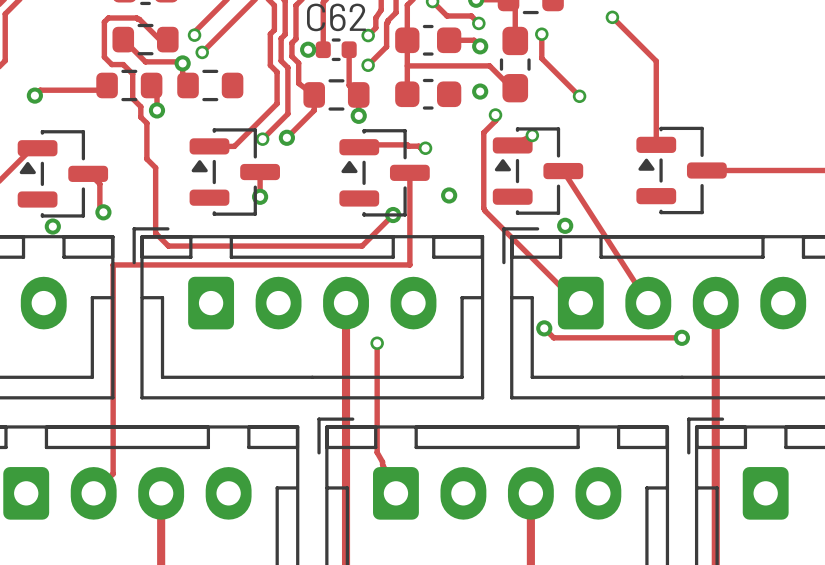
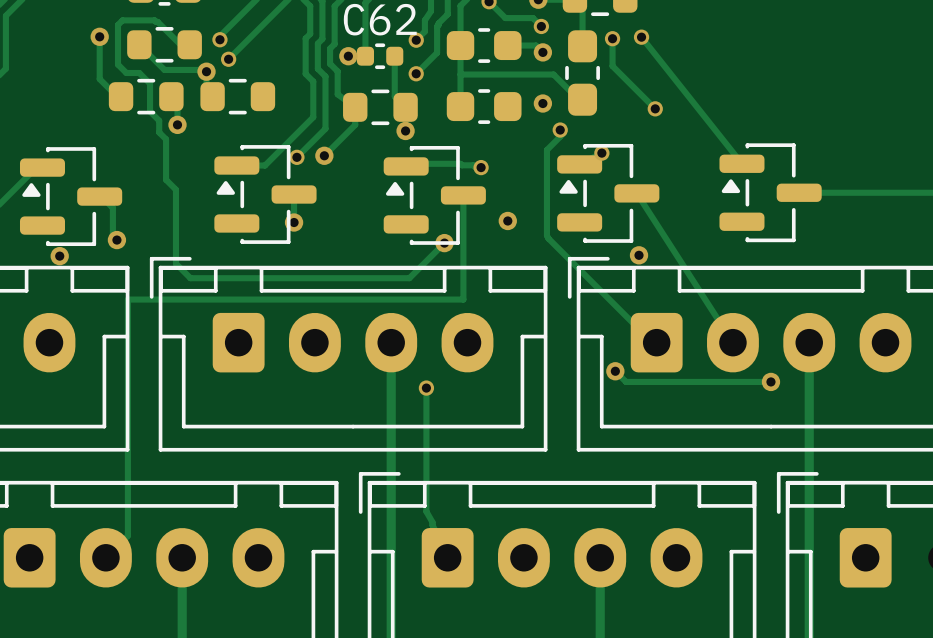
track: (612, 17) (656, 61) (656, 144) -> (641, 37) (741, 163)
via position: (612, 17) -> (641, 37)
track: (108, 90) (40, 90) (34, 95) -> (122, 101) (99, 79) (99, 36)
via position: (34, 95) -> (99, 36)

